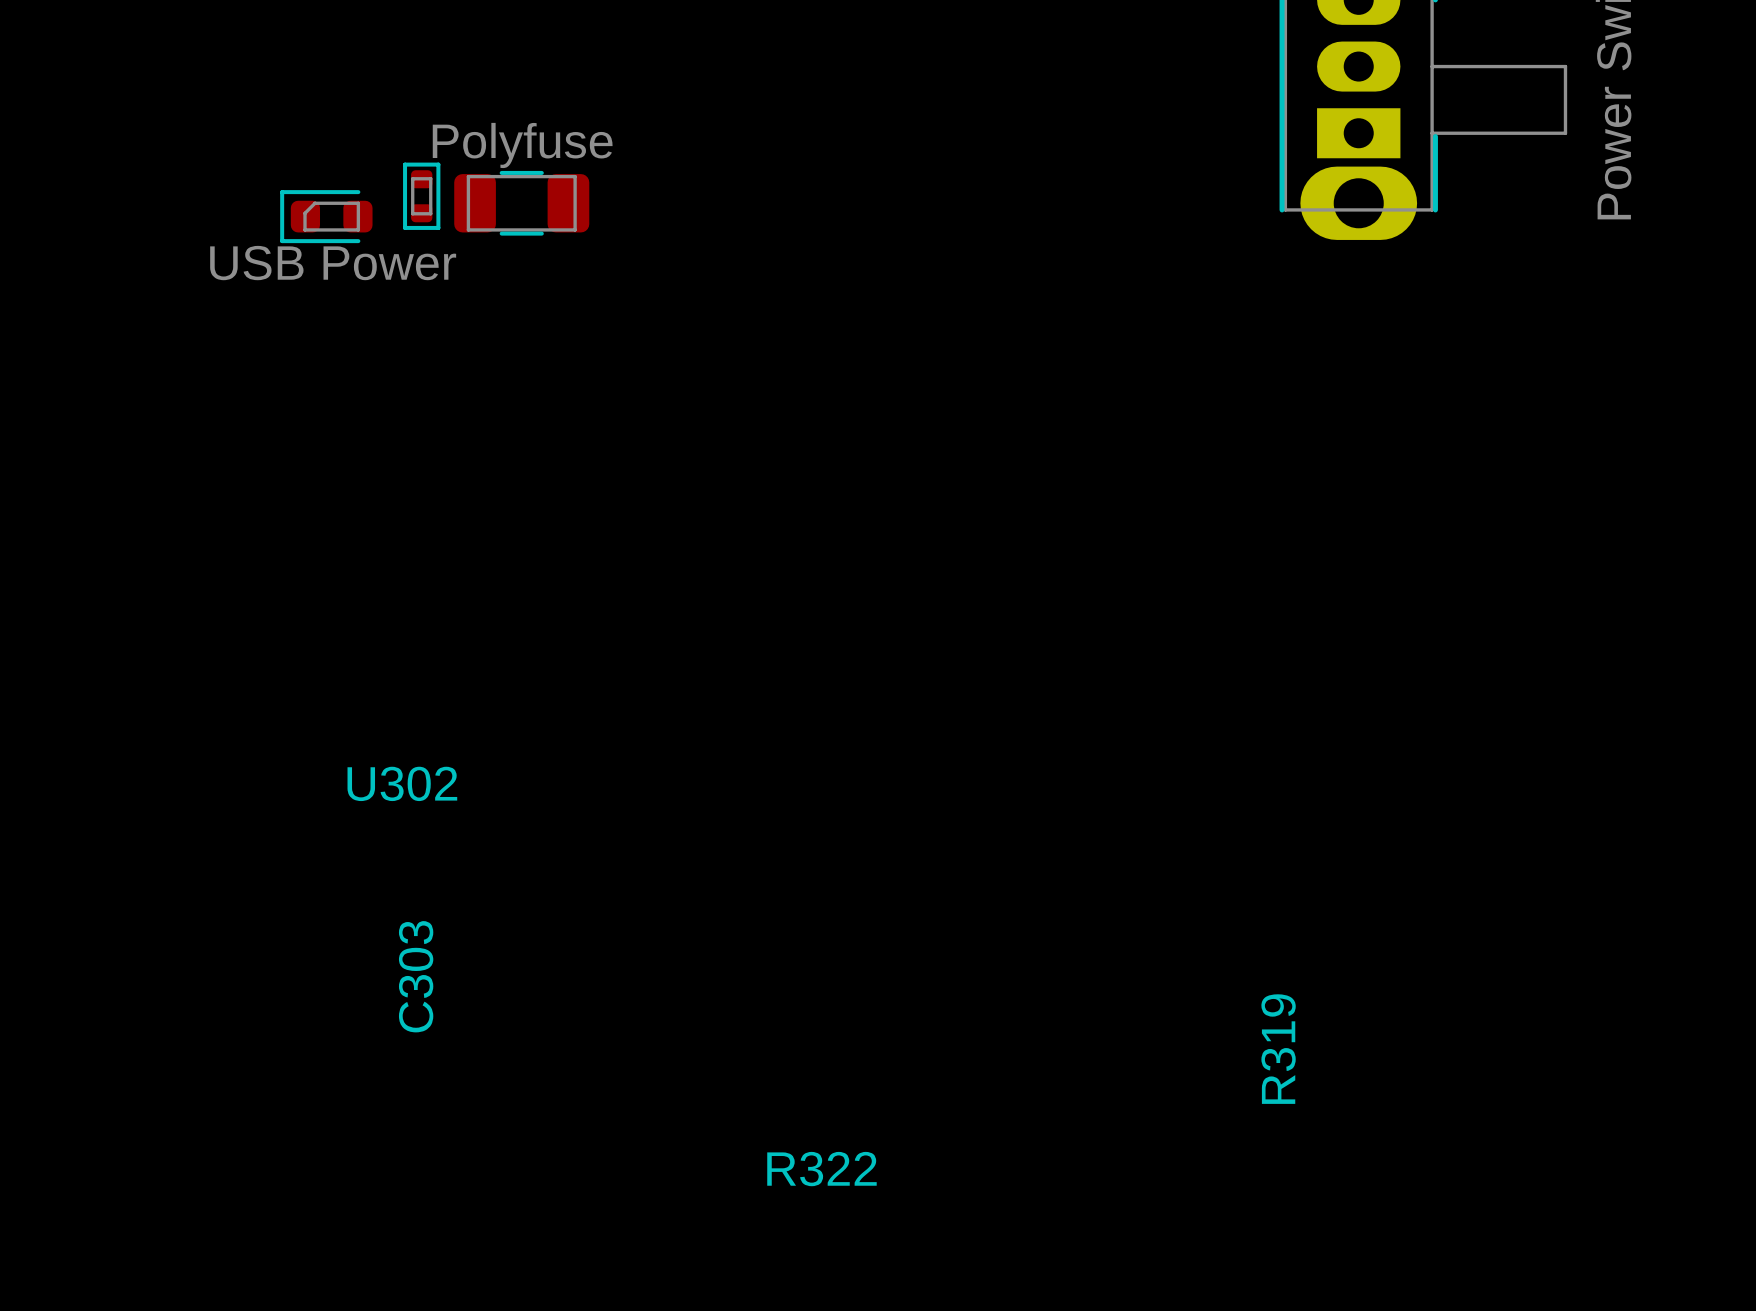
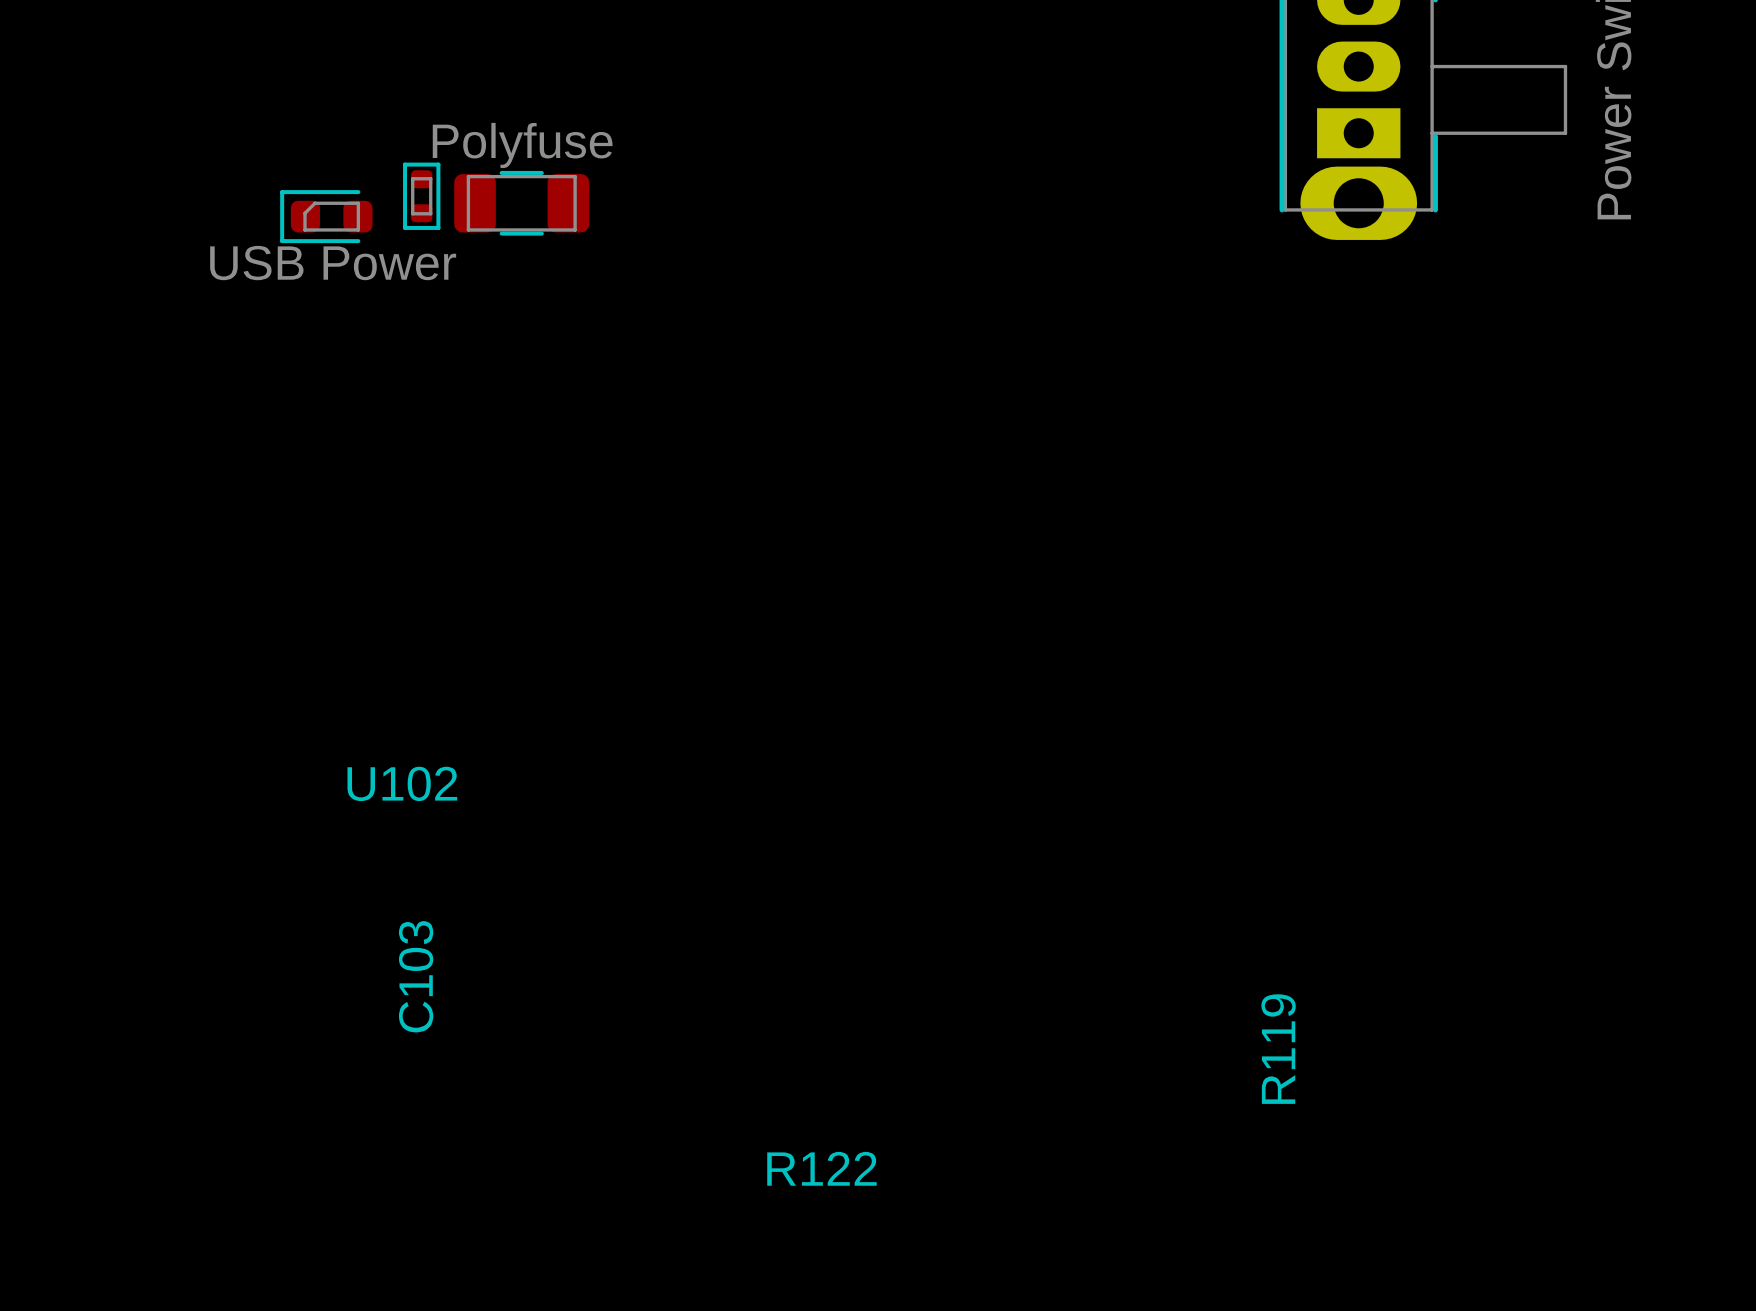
U302 name: U302 (402, 783) -> U102 (402, 783)
C303 name: C303 (416, 976) -> C103 (416, 976)
R319 name: R319 (1278, 1049) -> R119 (1278, 1049)
R322 name: R322 (821, 1169) -> R122 (821, 1168)

